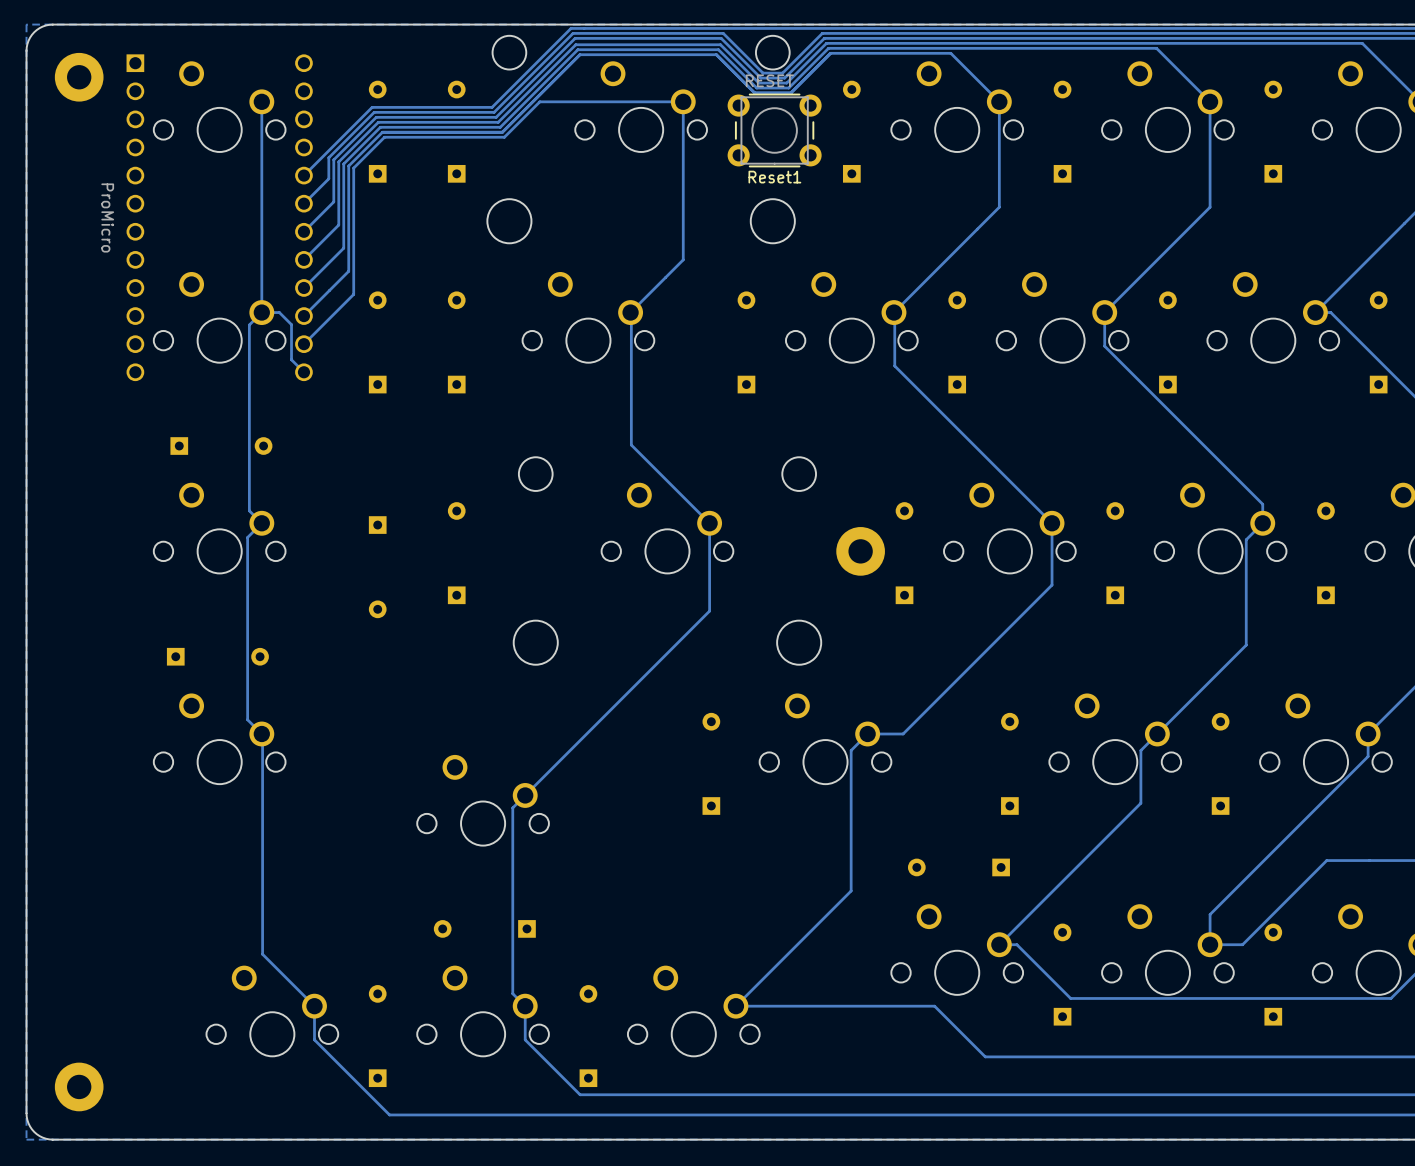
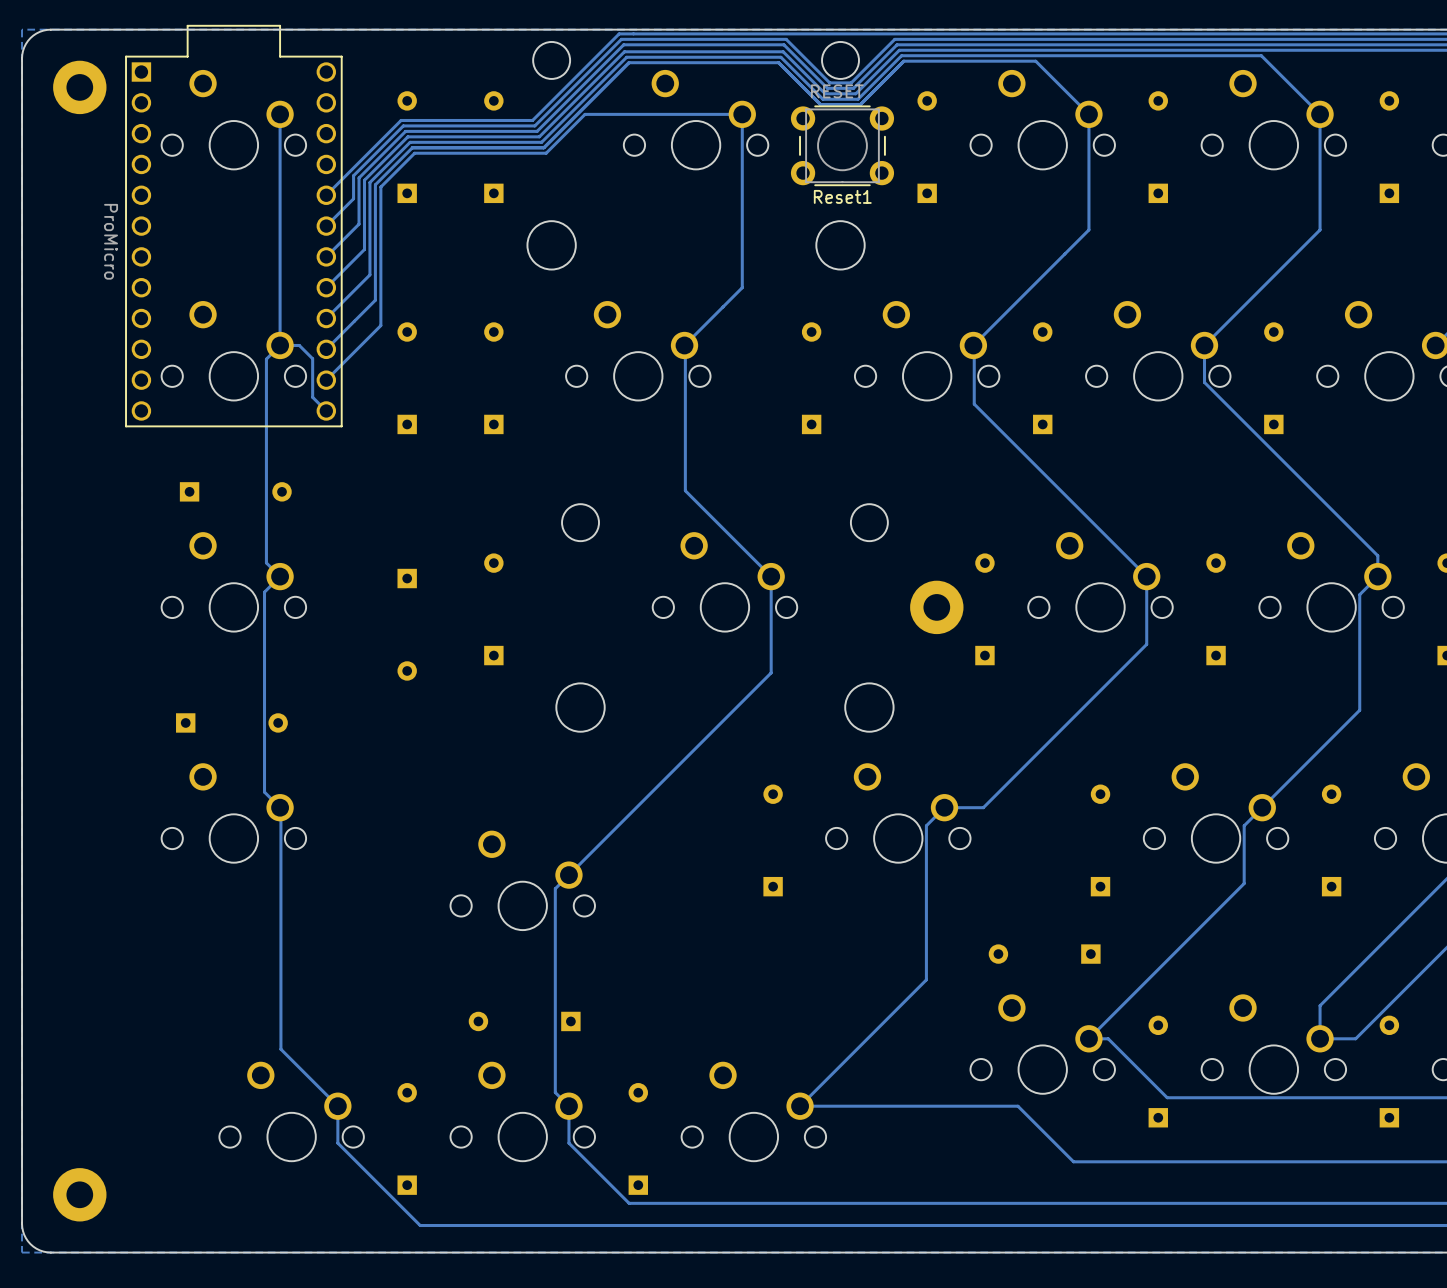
part: none -> ProMicro (233, 226)

